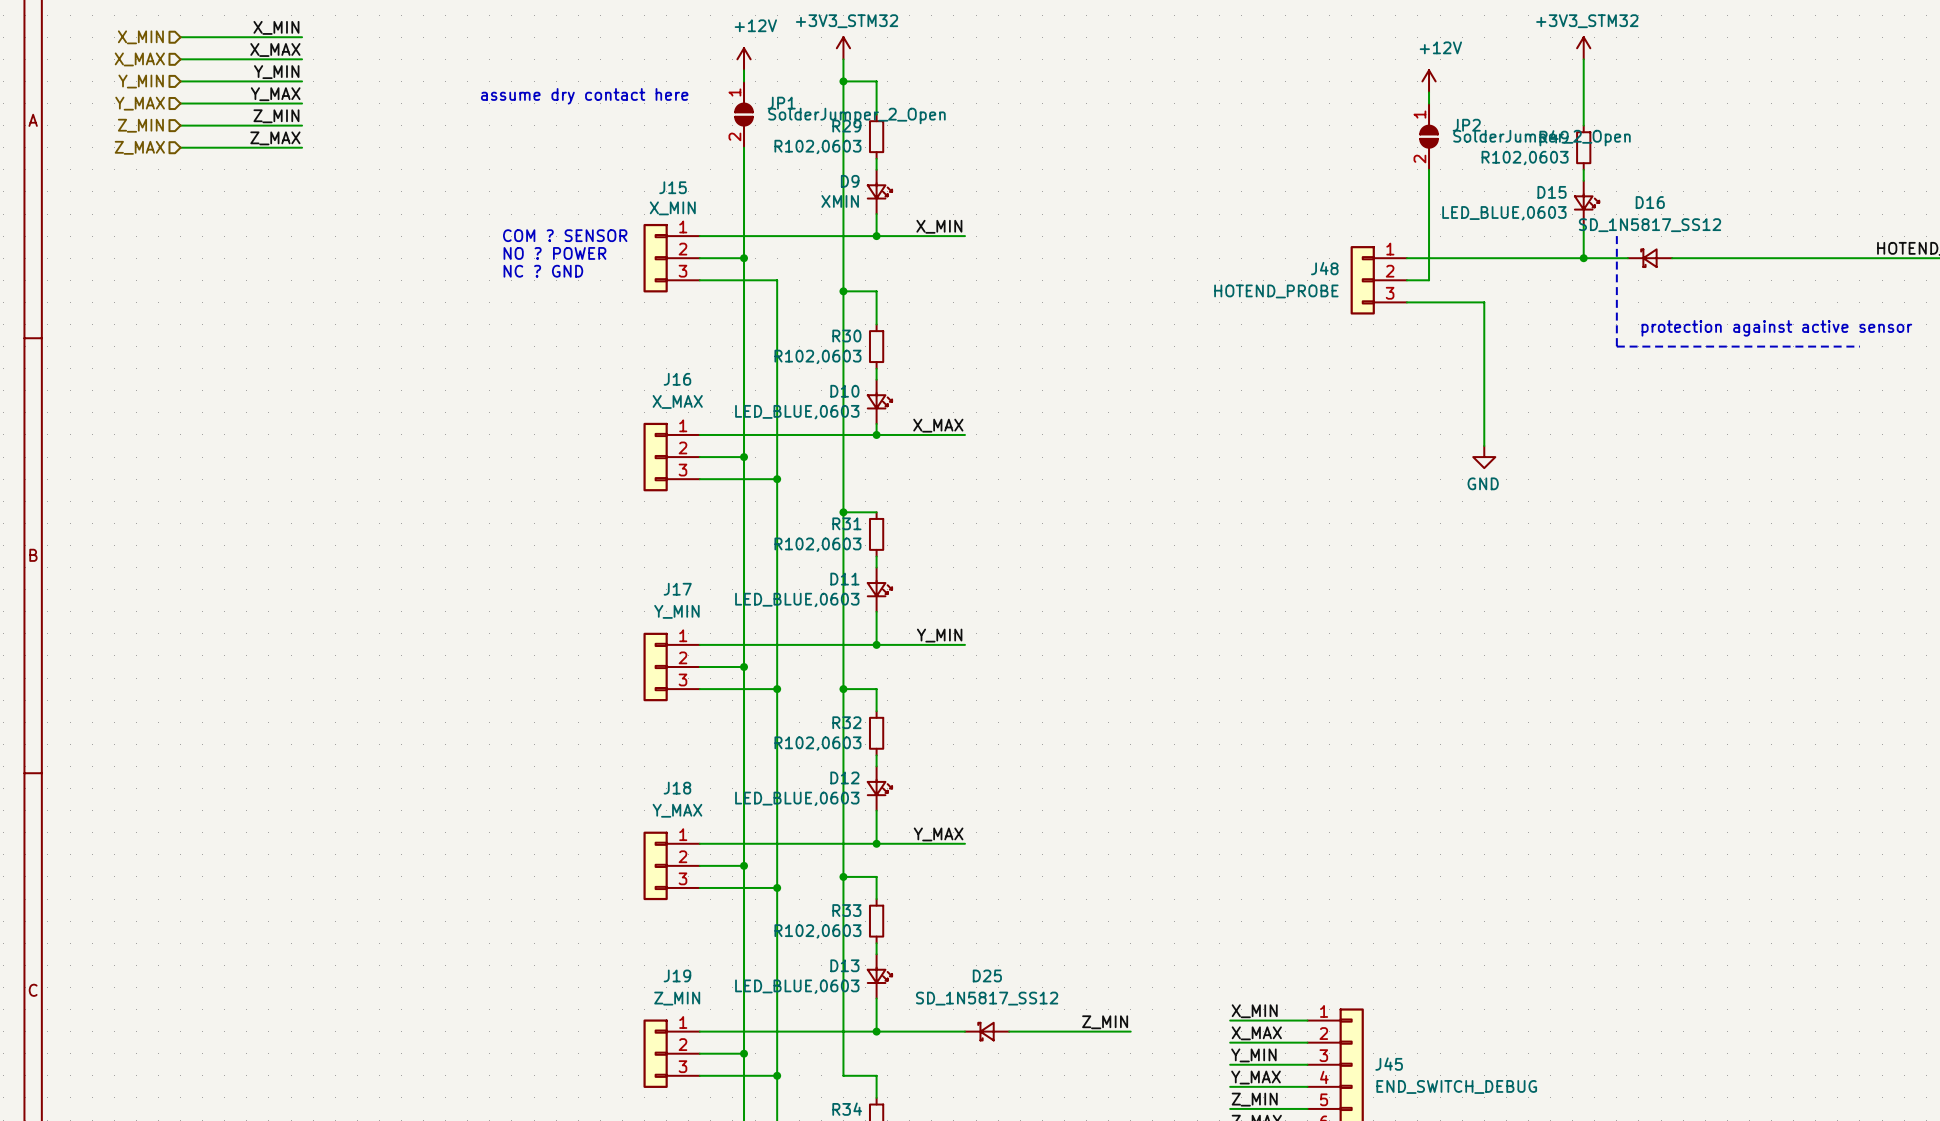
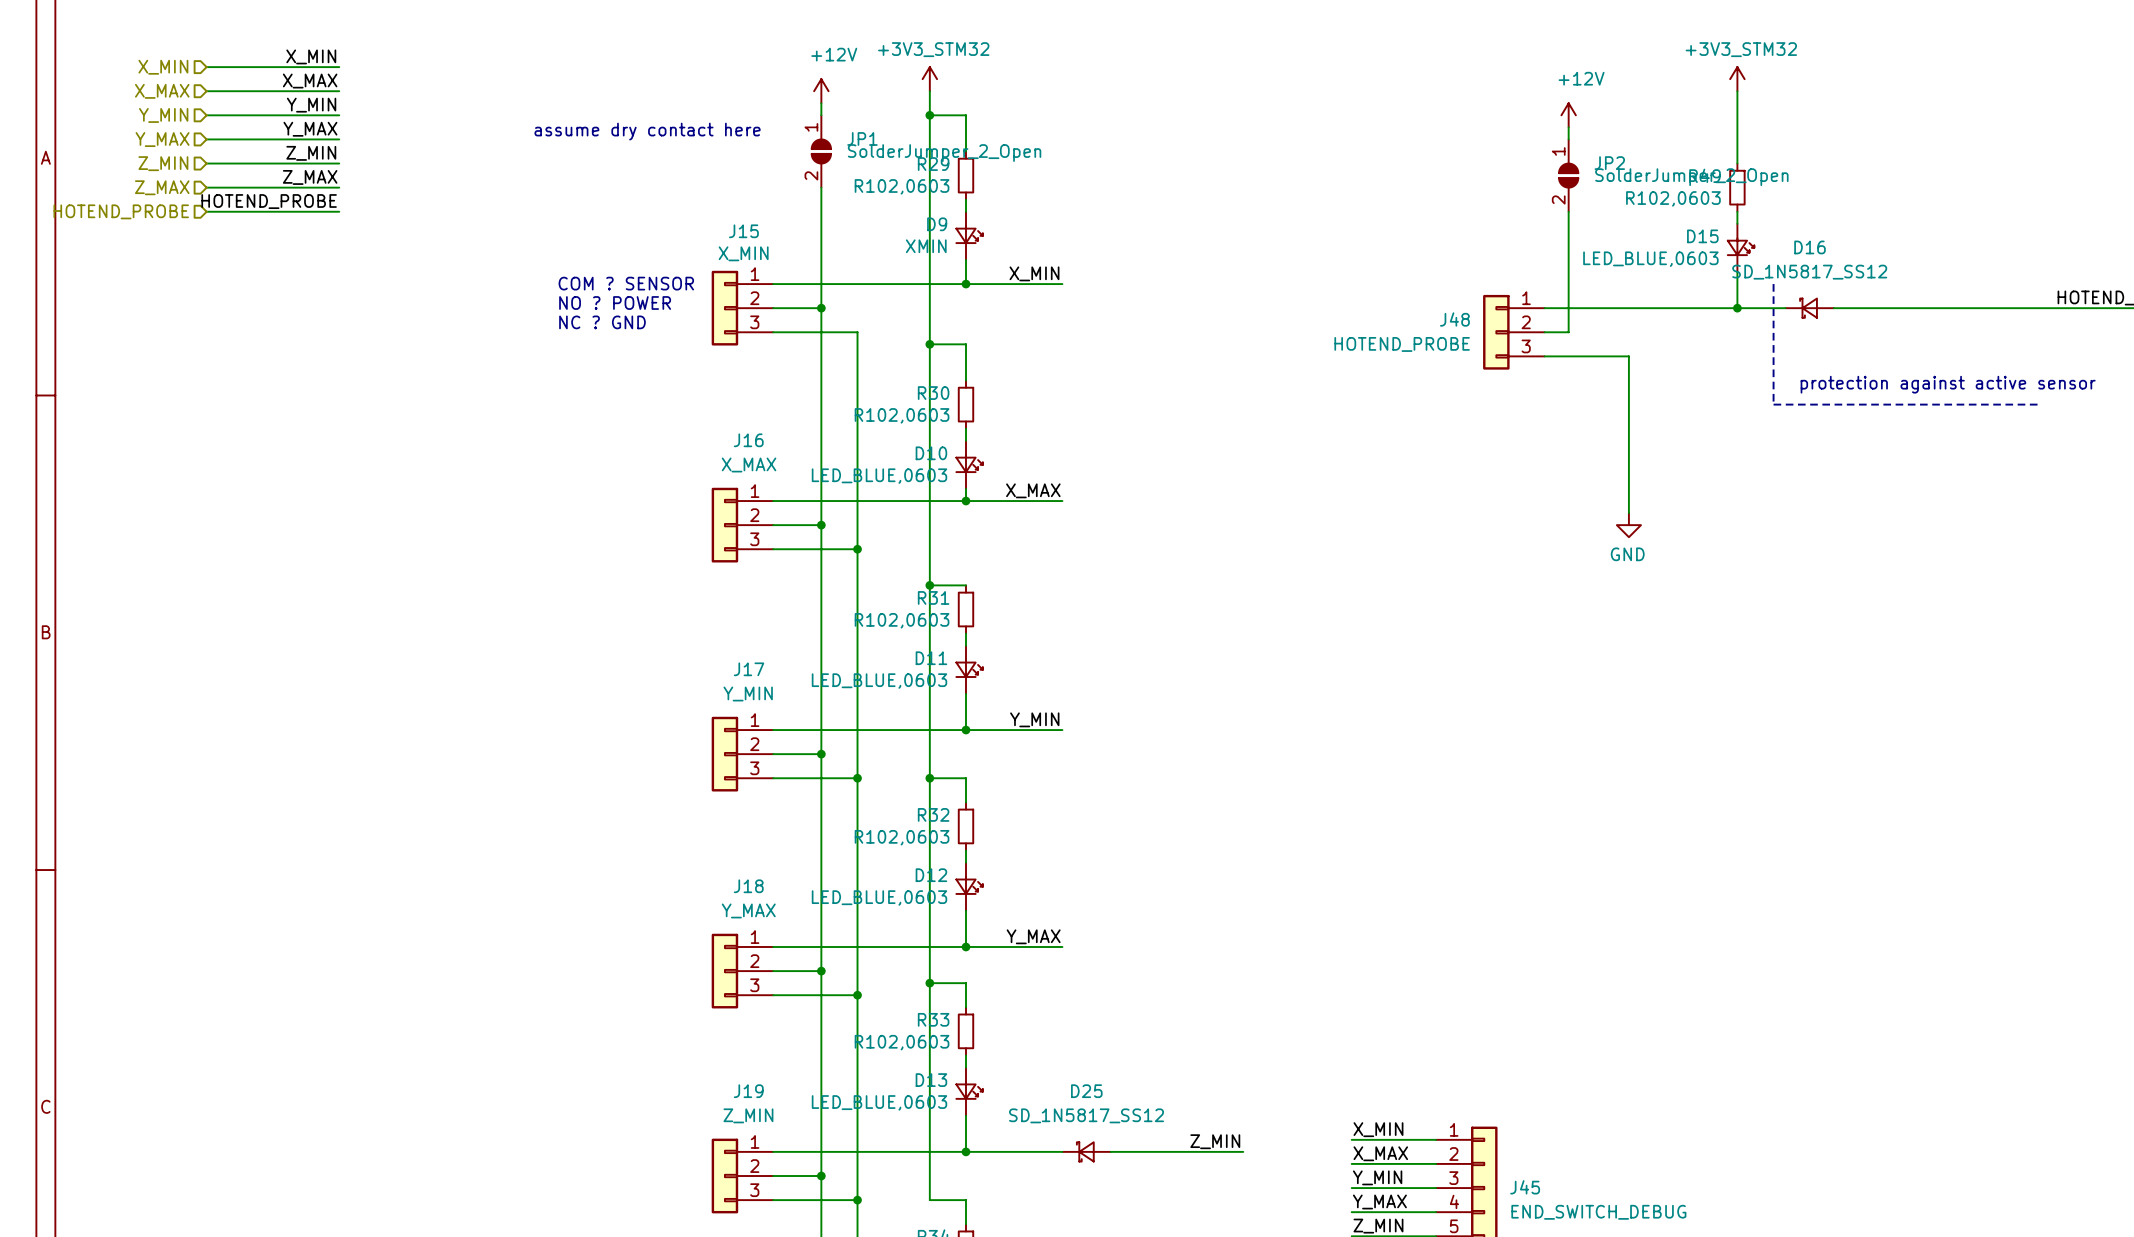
label: none -> HOTEND_PROBE (269, 201)
hierarchical label: none -> HOTEND_PROBE (121, 211)
wire: none -> (206, 211) (339, 211)

